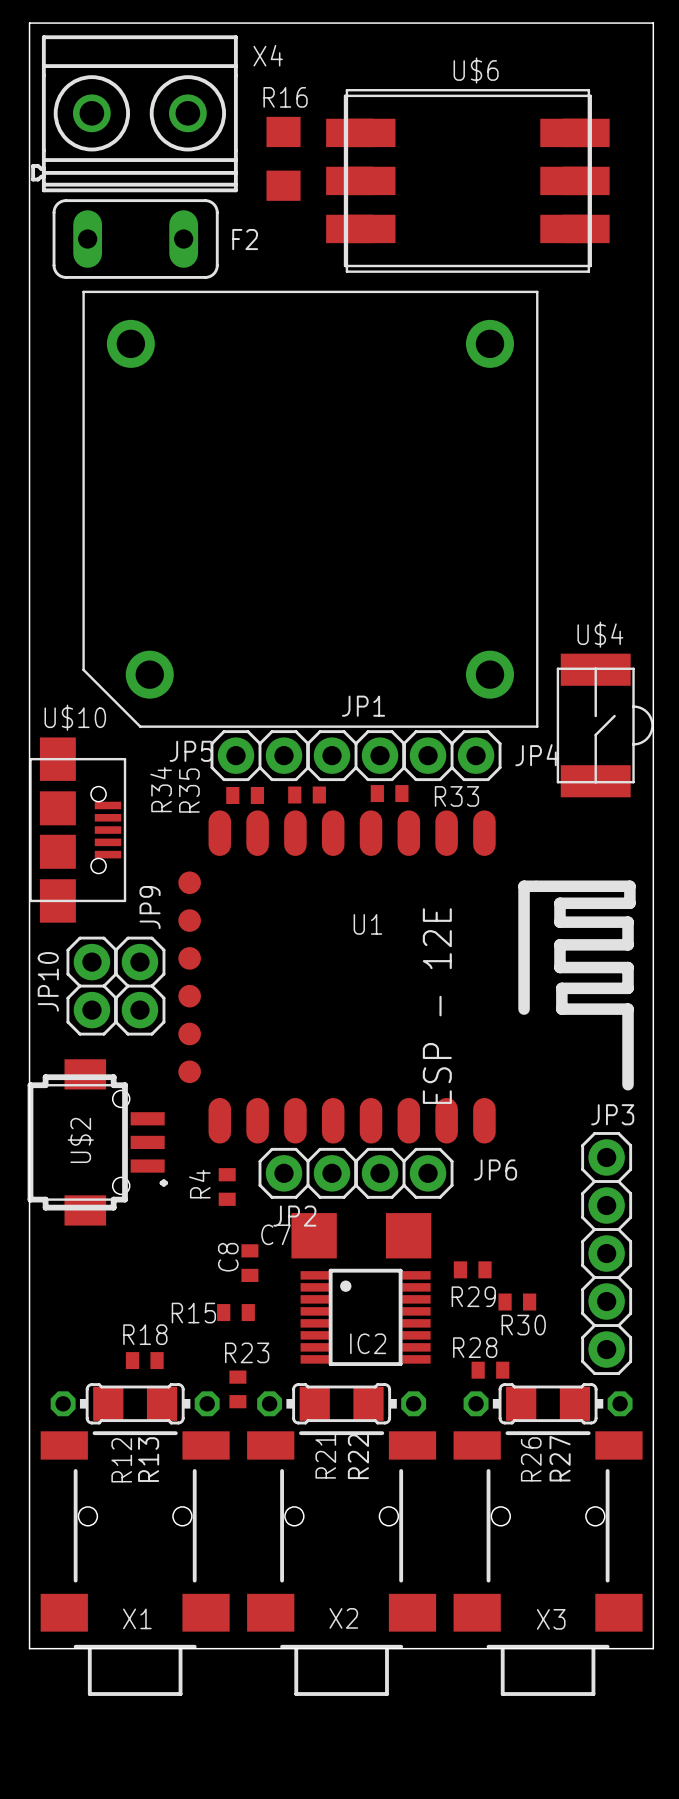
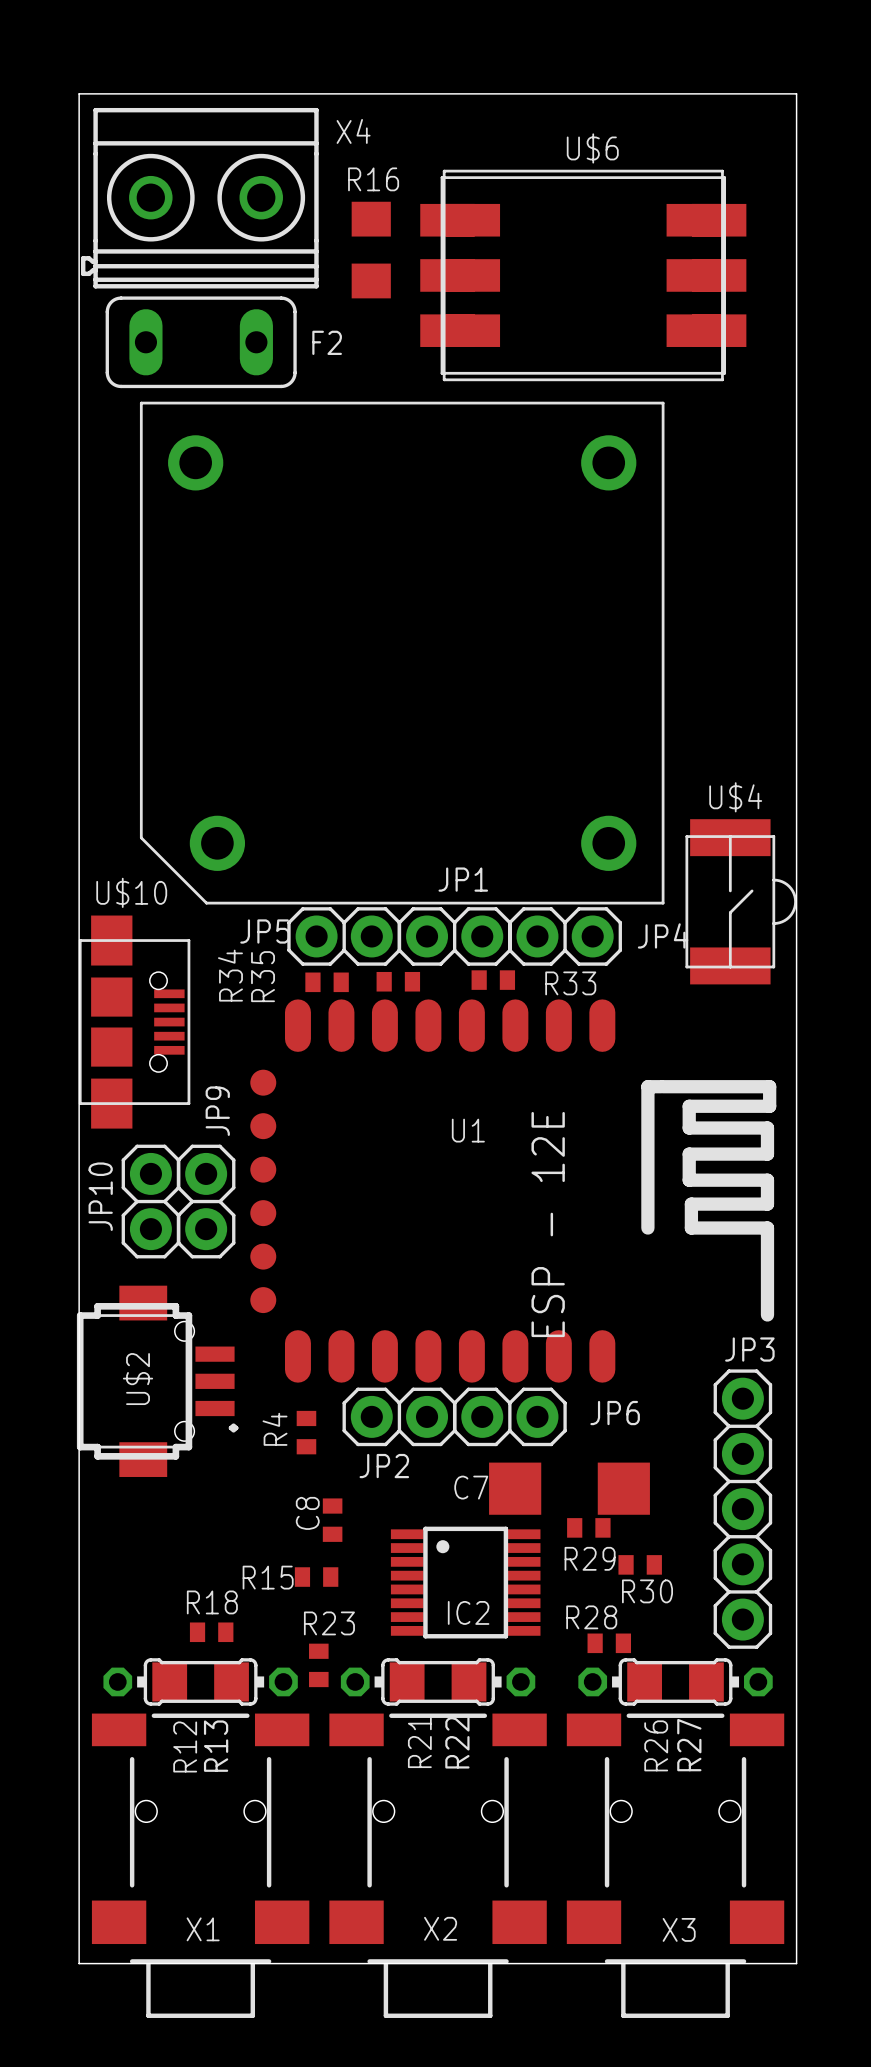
C7 position: (361, 1235) -> (569, 1488)

